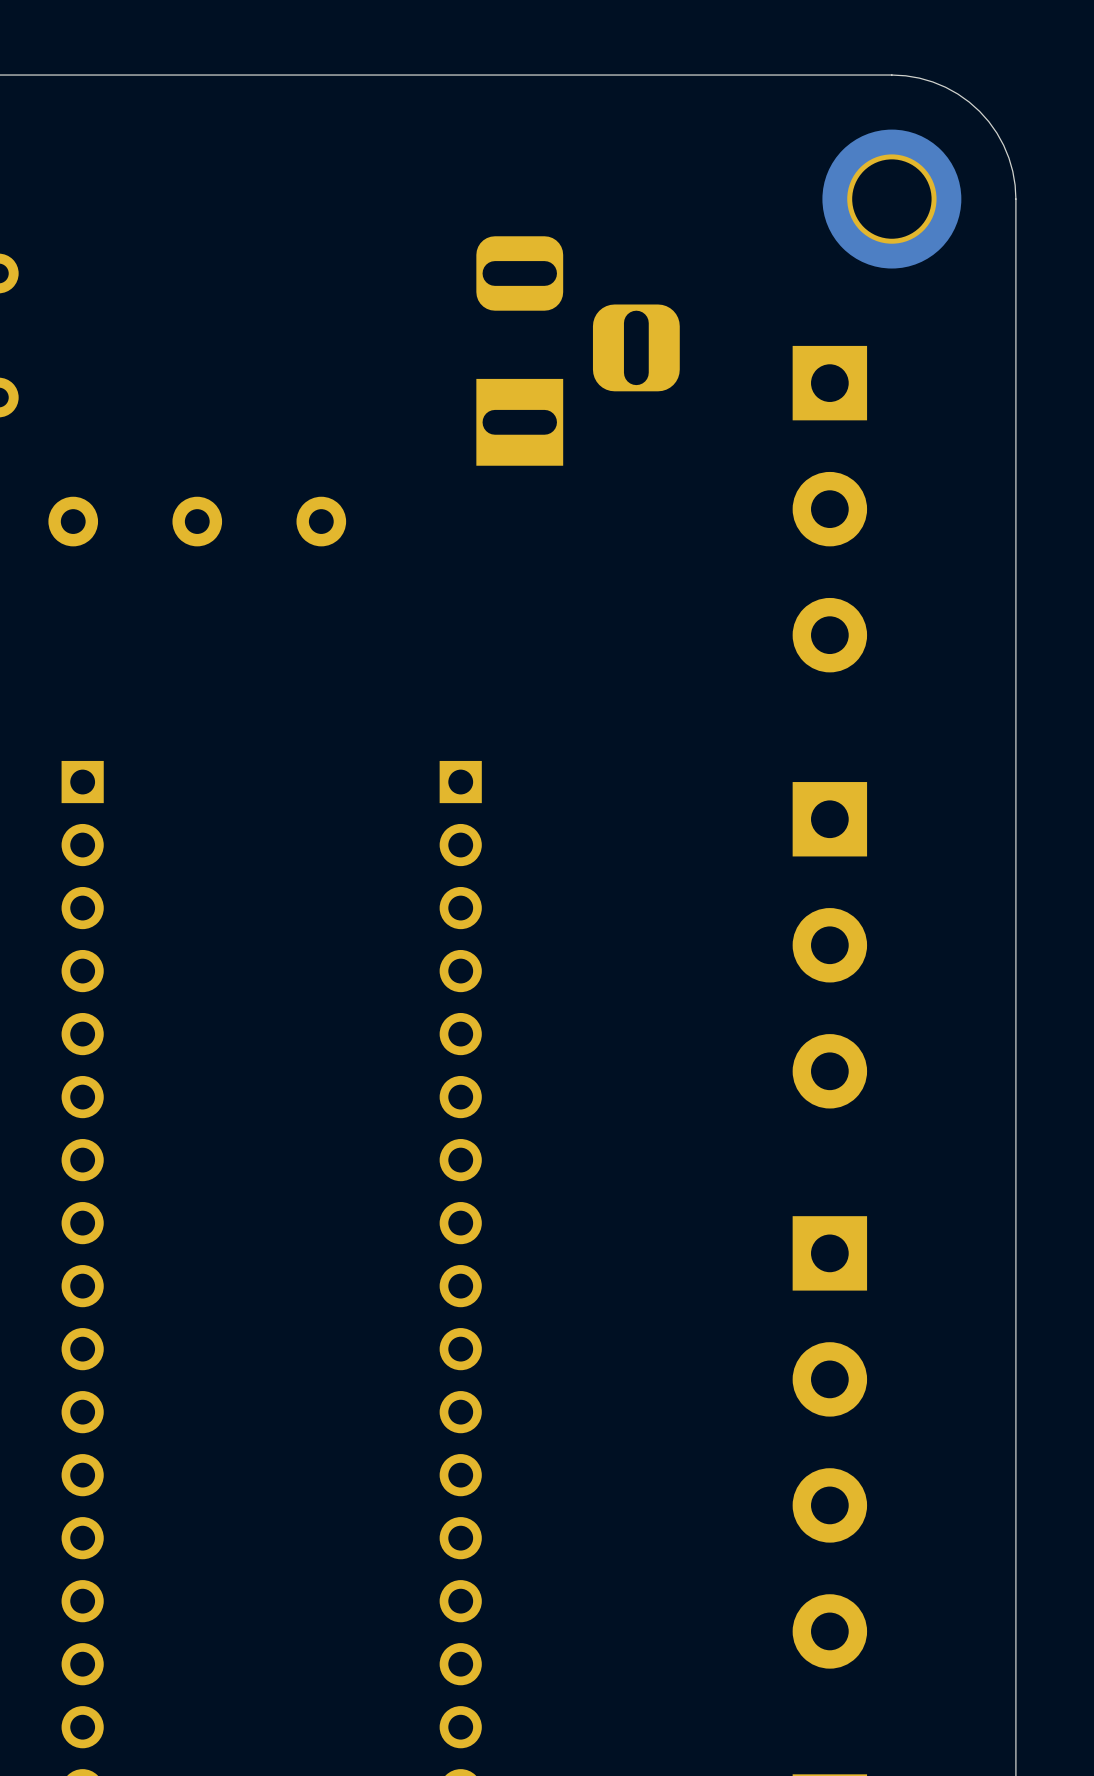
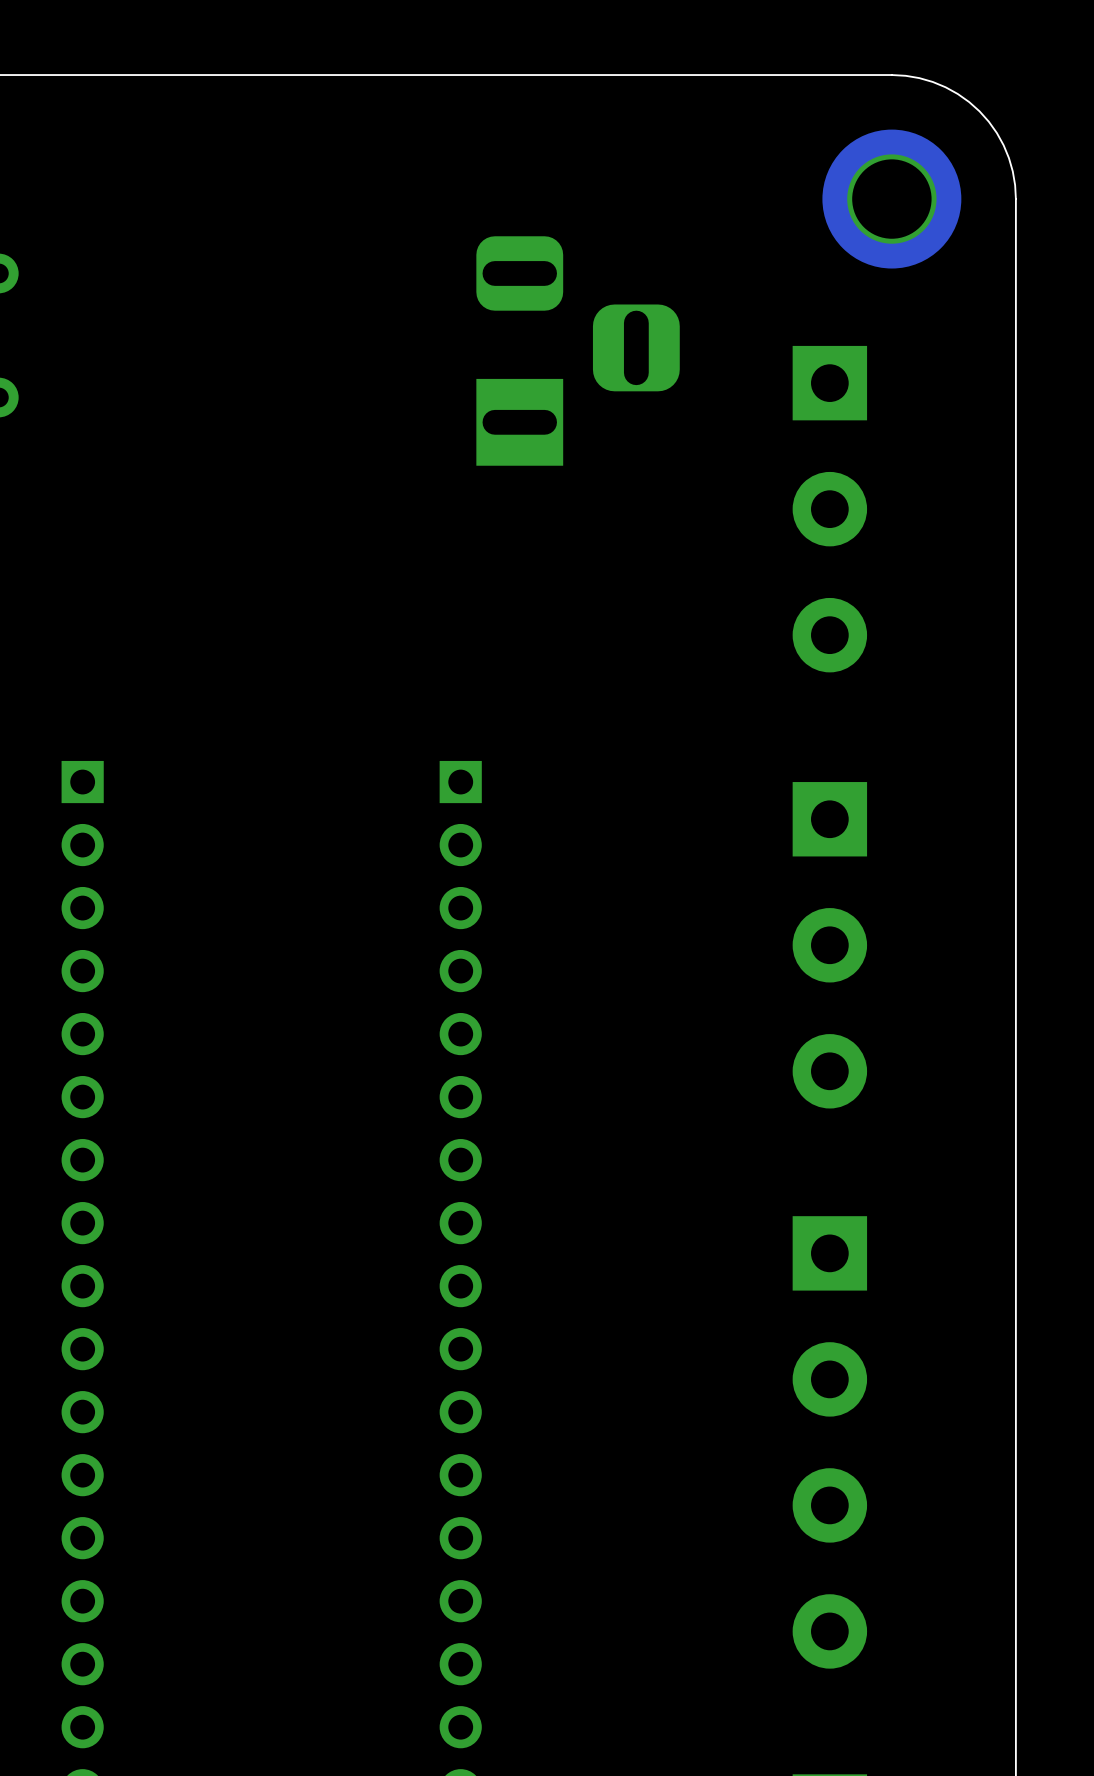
part: (73, 521) -> none
part: (197, 521) -> none
part: (321, 521) -> none

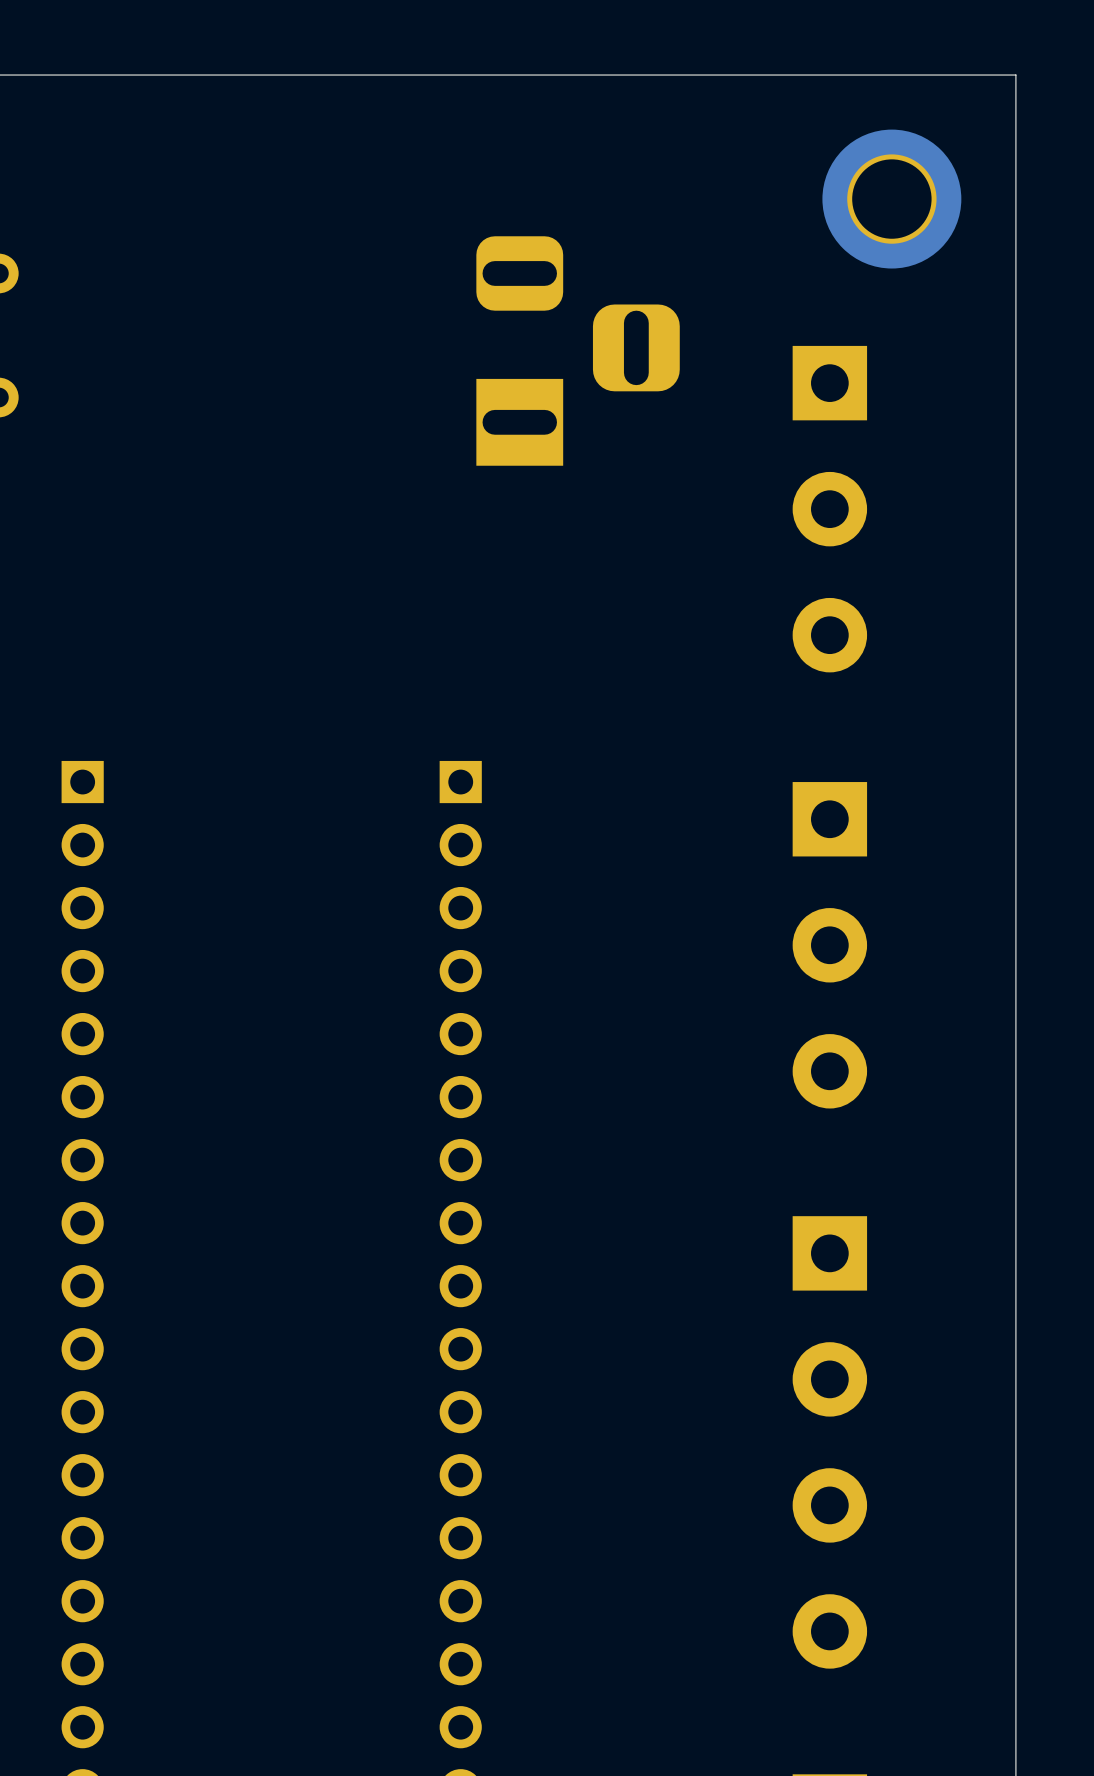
board edge: (891, 75) (919, 78) (945, 87) (969, 102) (979, 111) (996, 133) (1008, 158) (1015, 185) (1015, 199) -> (891, 75) (1015, 75) (1015, 199)

